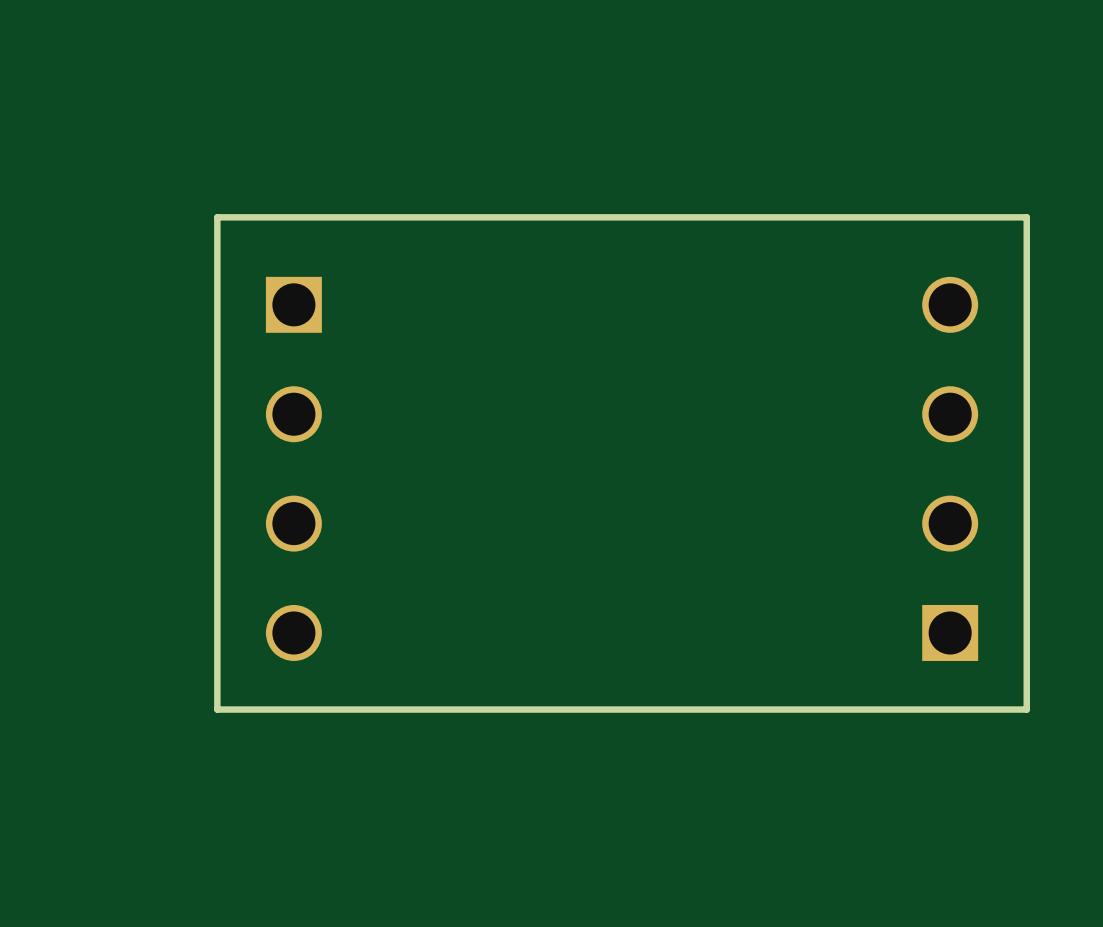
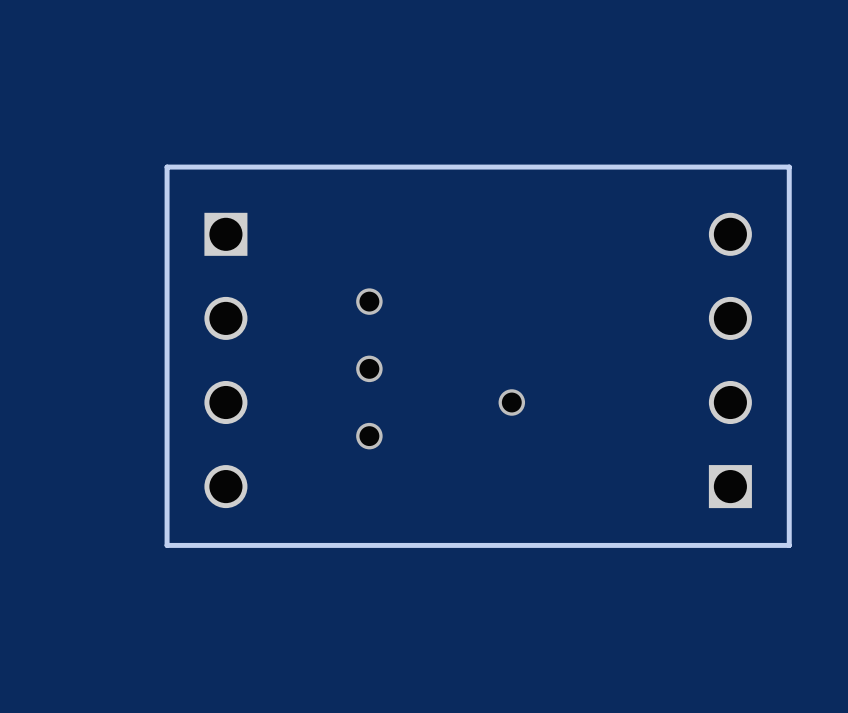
via: none -> (369, 301)
via: none -> (369, 368)
via: none -> (511, 402)
via: none -> (369, 436)

